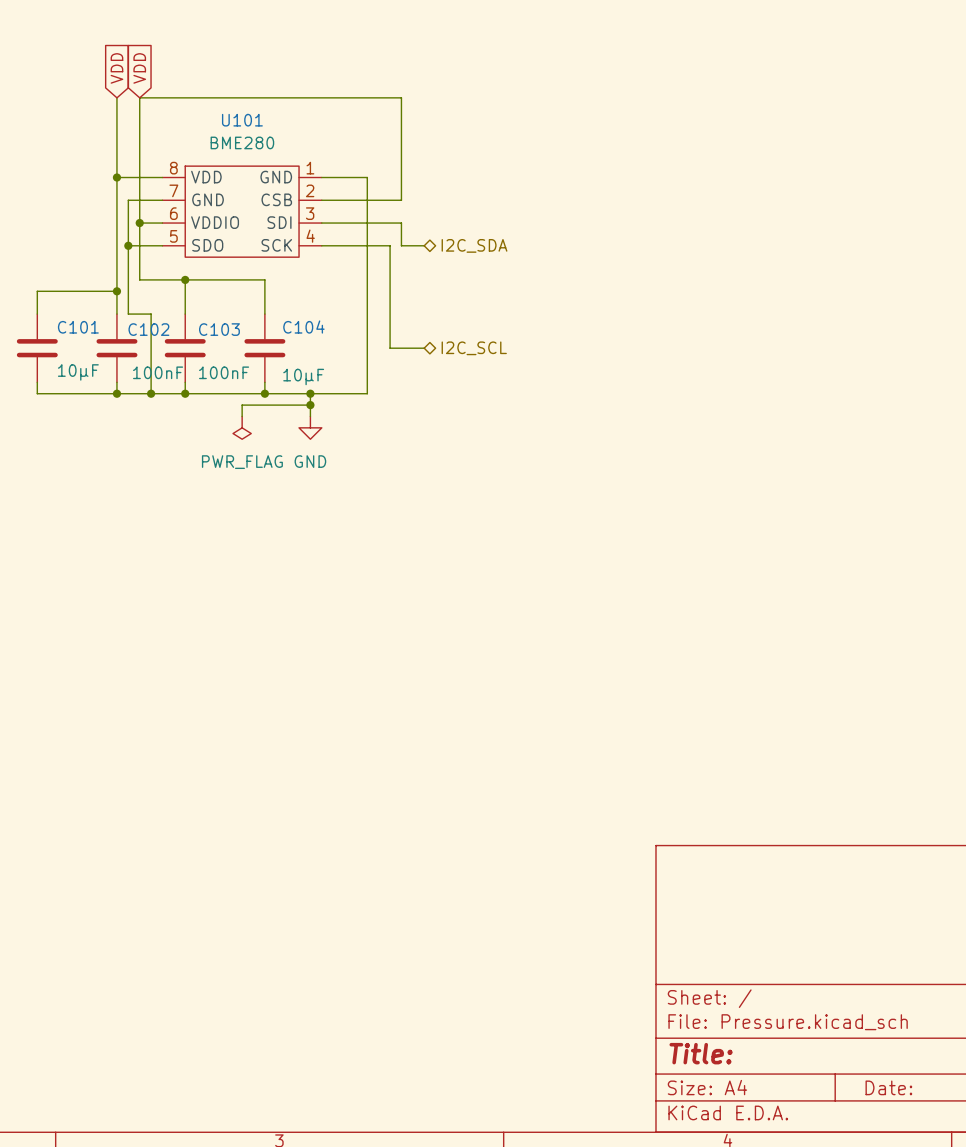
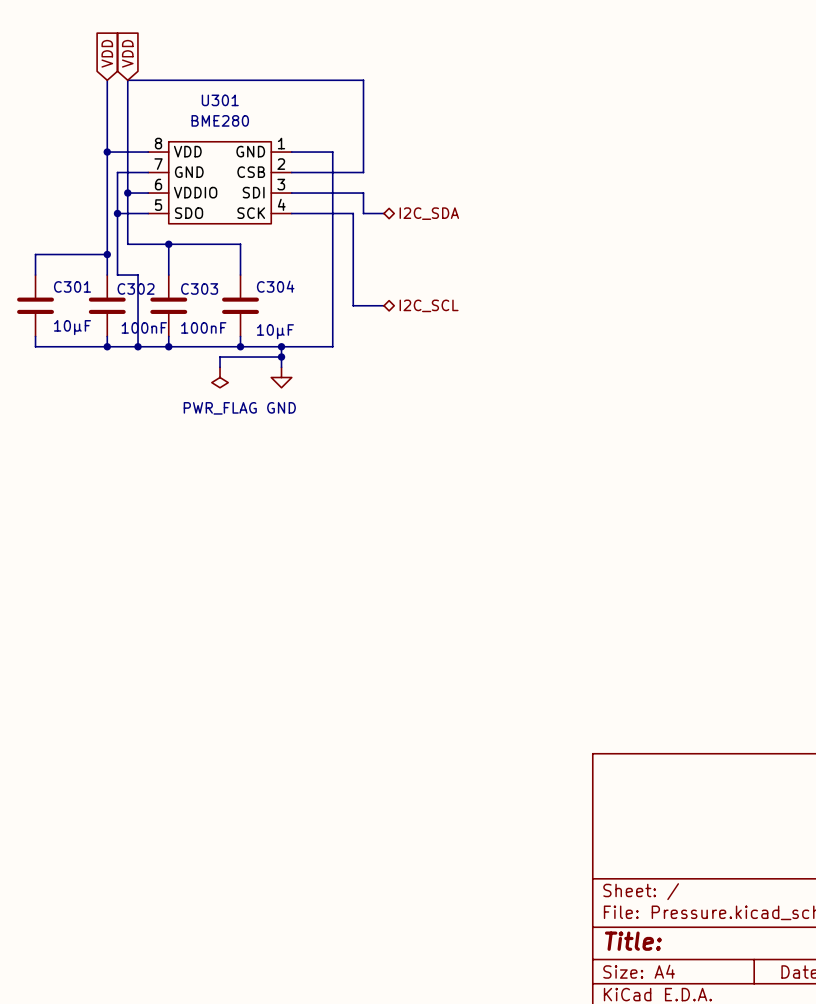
U101 name: U101 (242, 120) -> U301 (220, 100)
C101 name: C101 (78, 327) -> C301 (72, 286)
C104 name: C104 (303, 327) -> C304 (275, 286)
C102 name: C102 (148, 329) -> C302 (136, 288)
C103 name: C103 (219, 329) -> C303 (199, 288)

